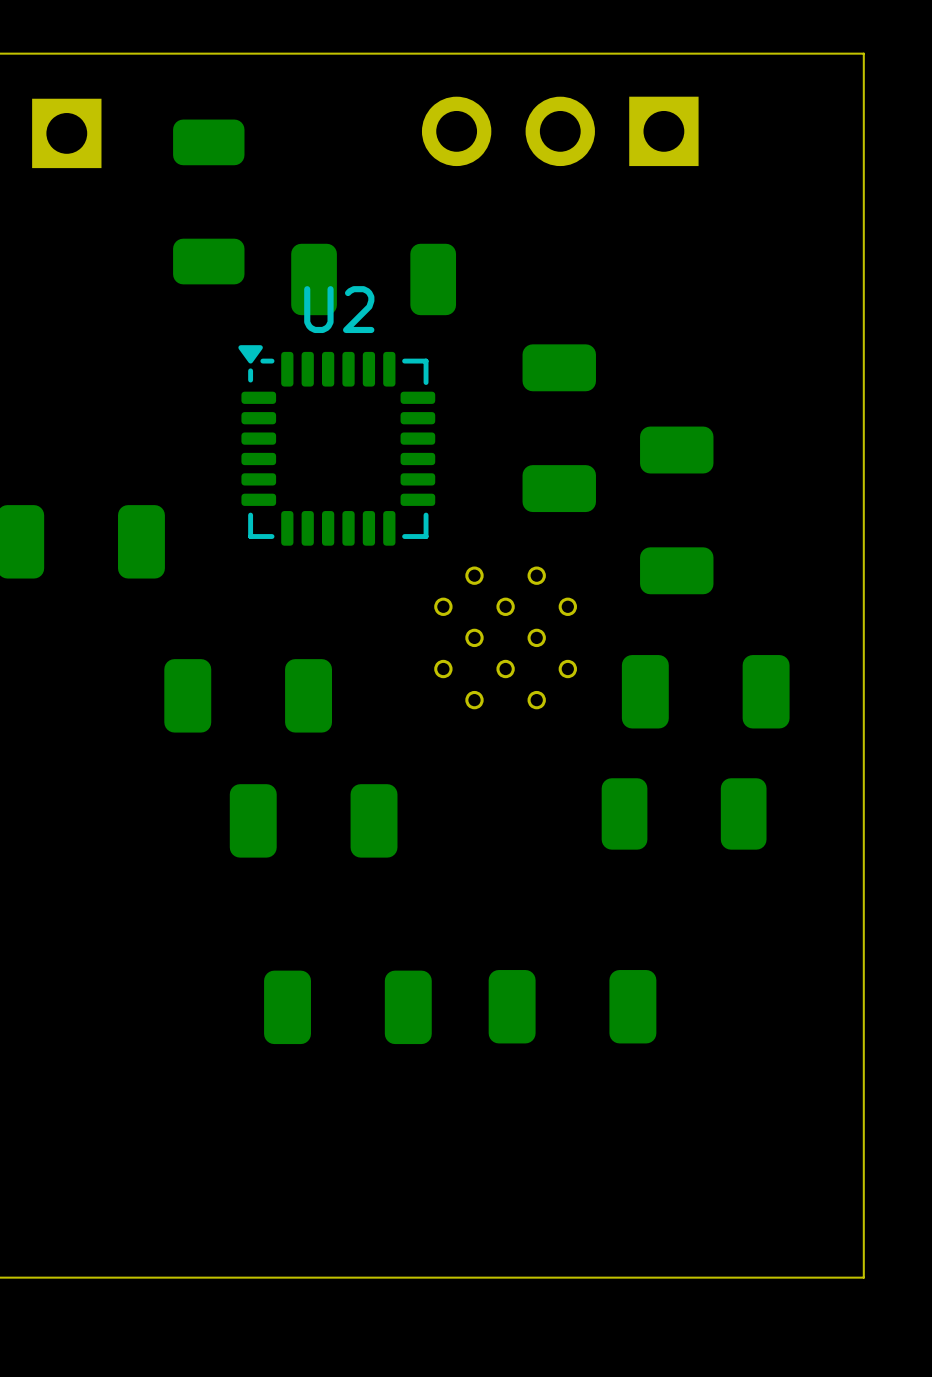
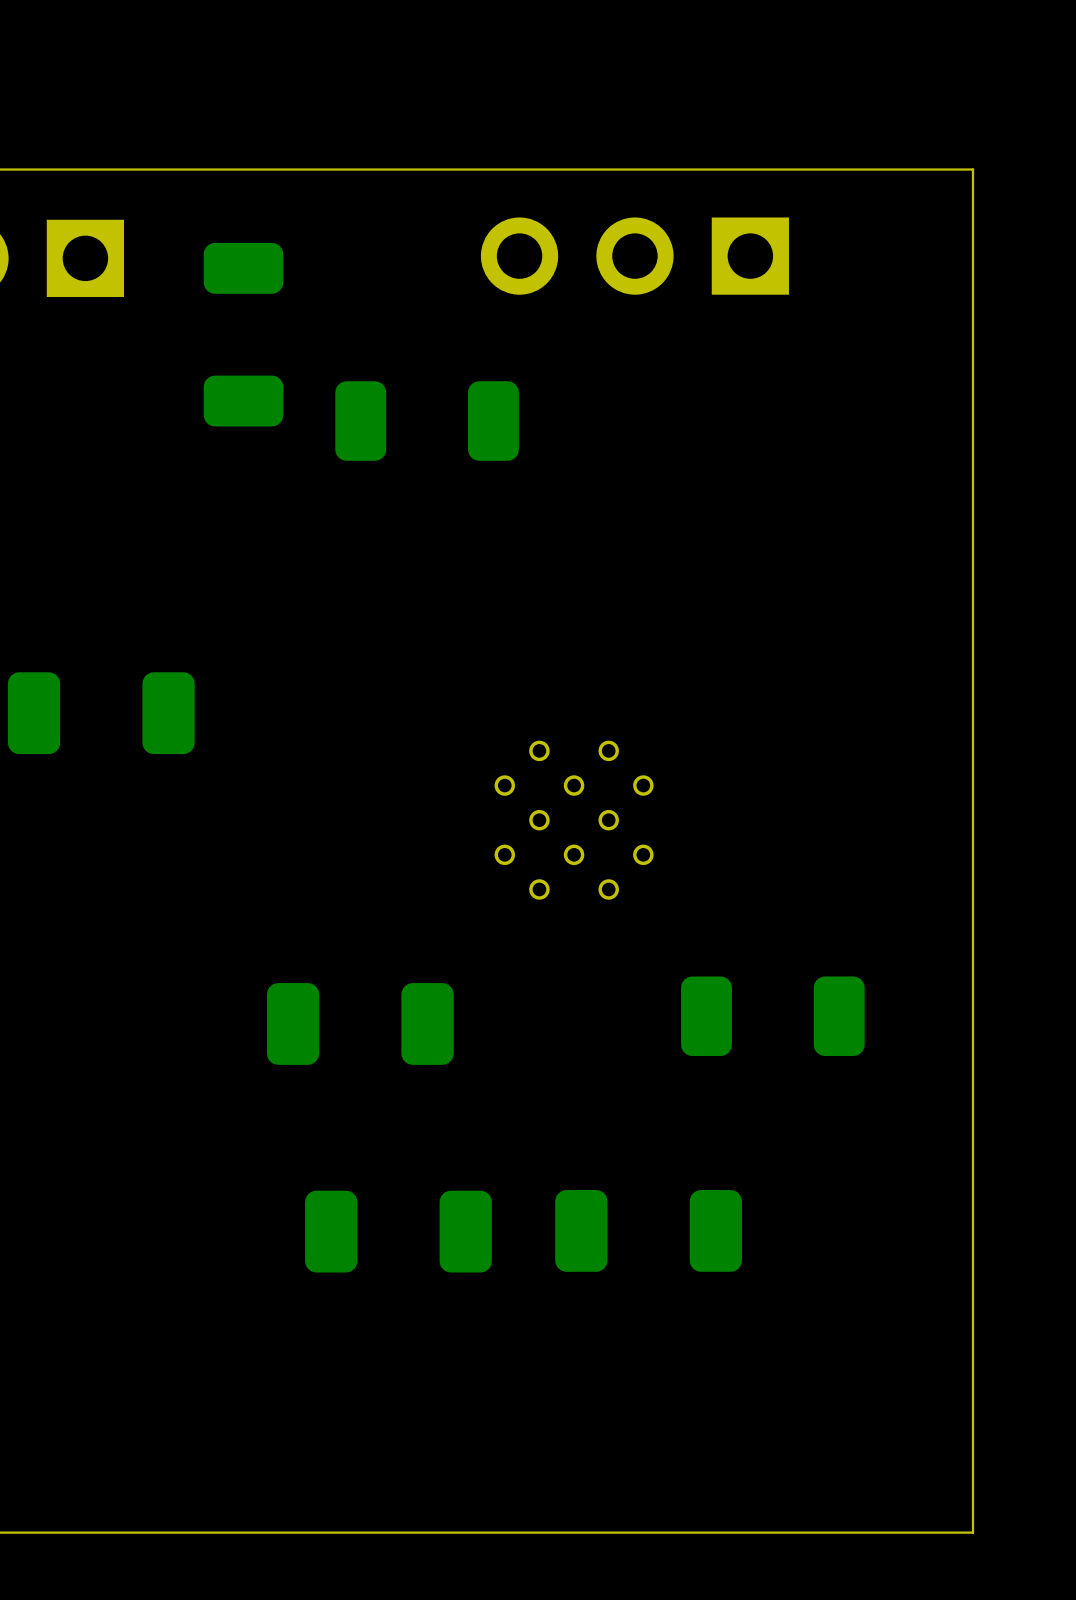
part: (559, 428) -> none
U2: (336, 445) -> none
part: (676, 510) -> none
part: (705, 691) -> none
part: (248, 695) -> none

